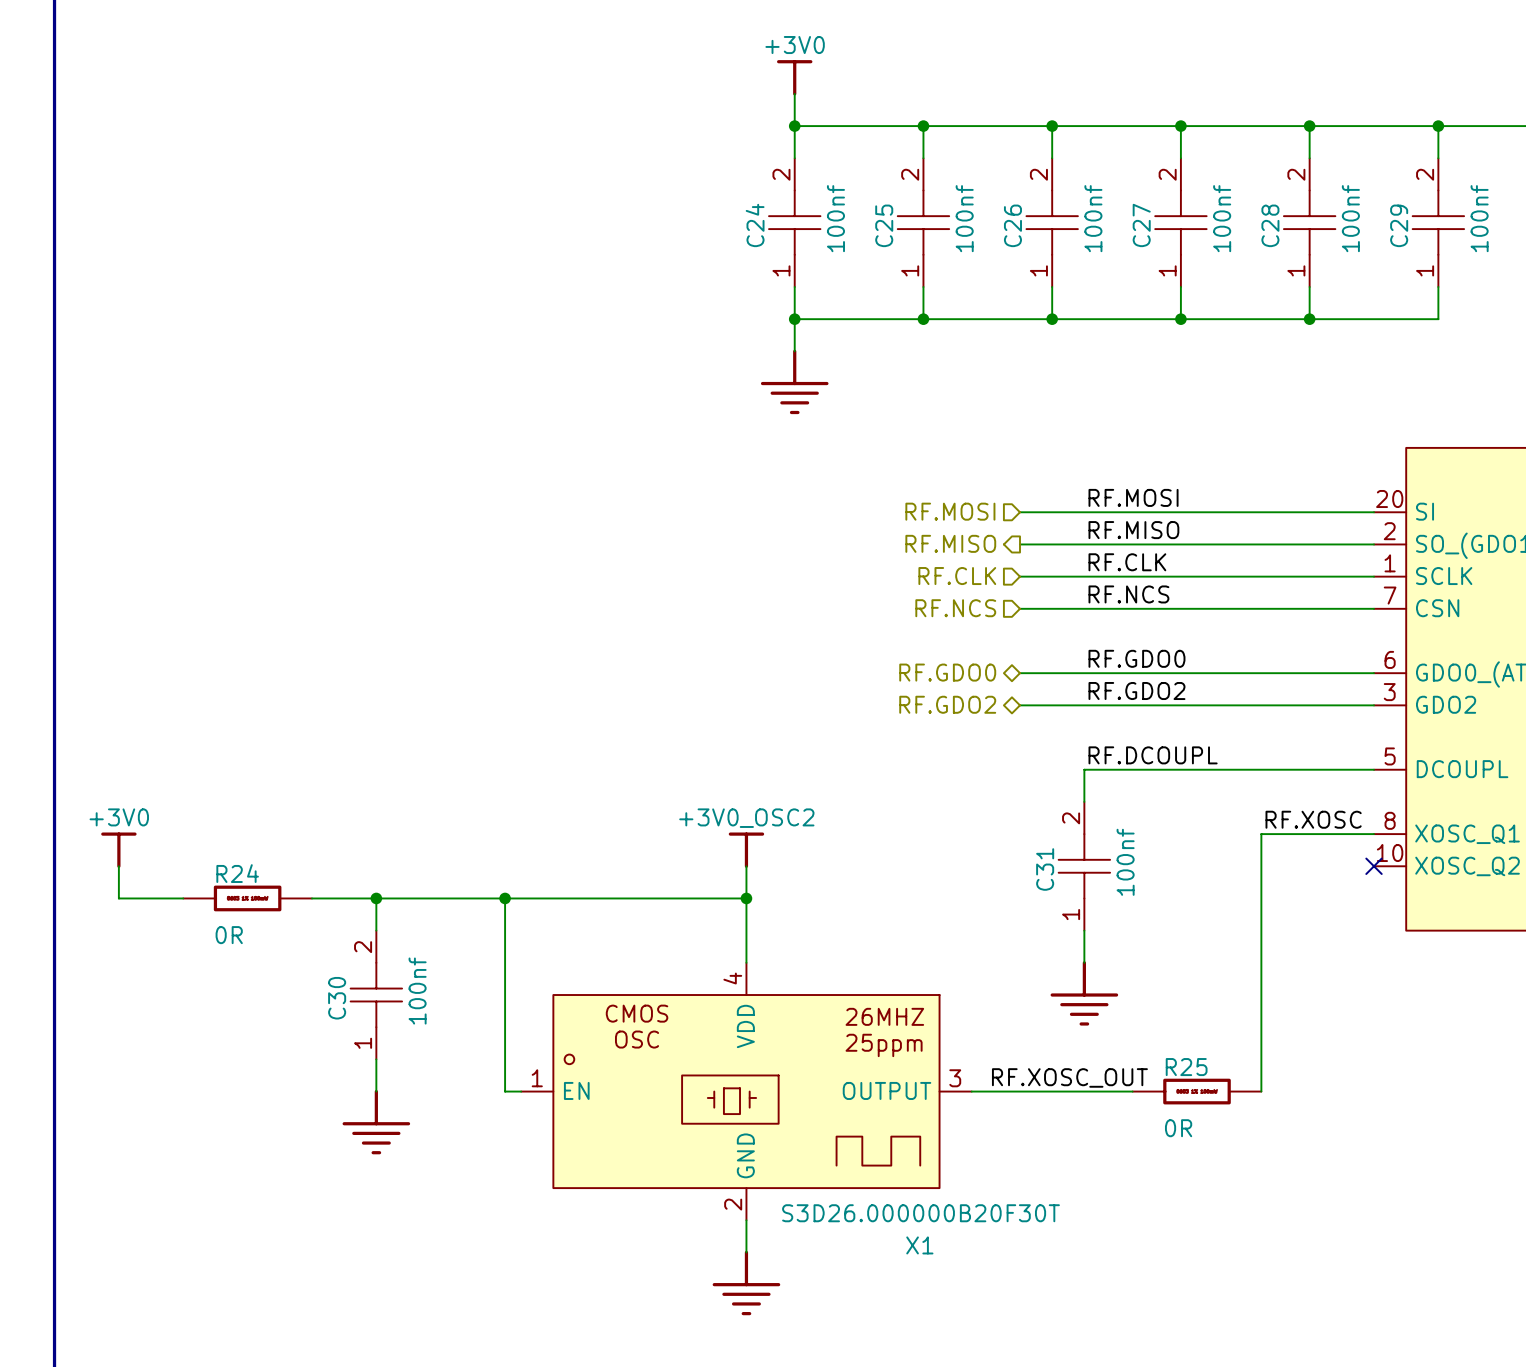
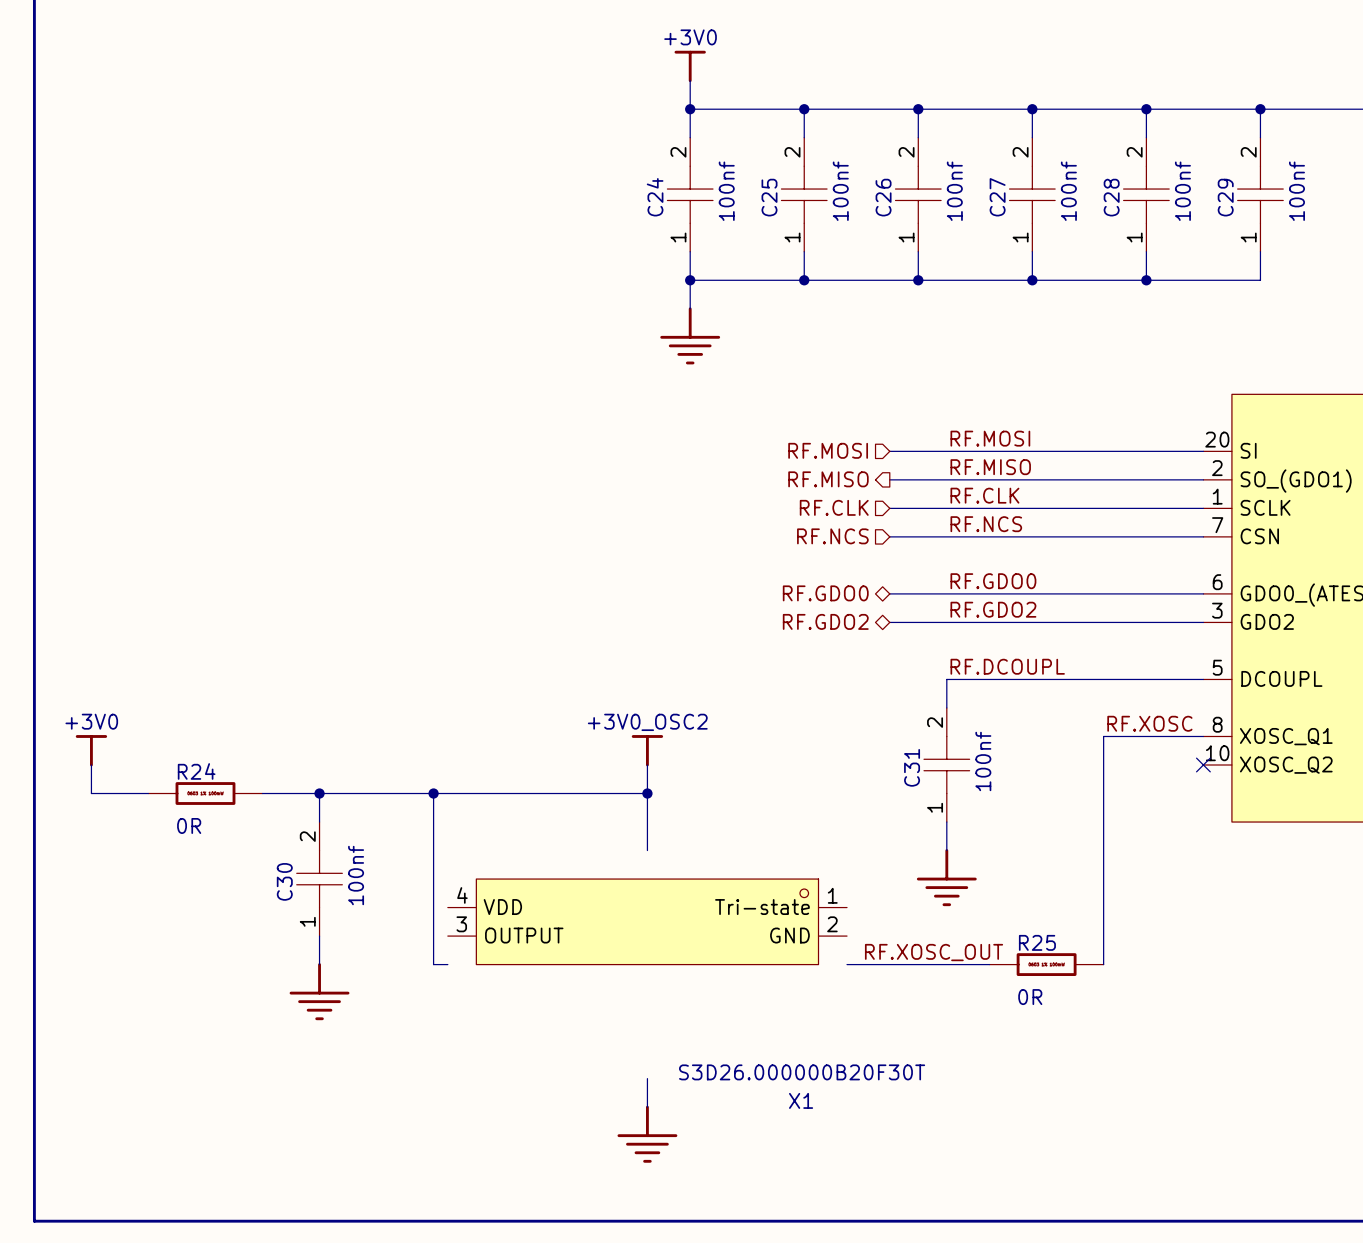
X1 symbol: [521, 962, 972, 1221] -> [447, 879, 848, 965]

